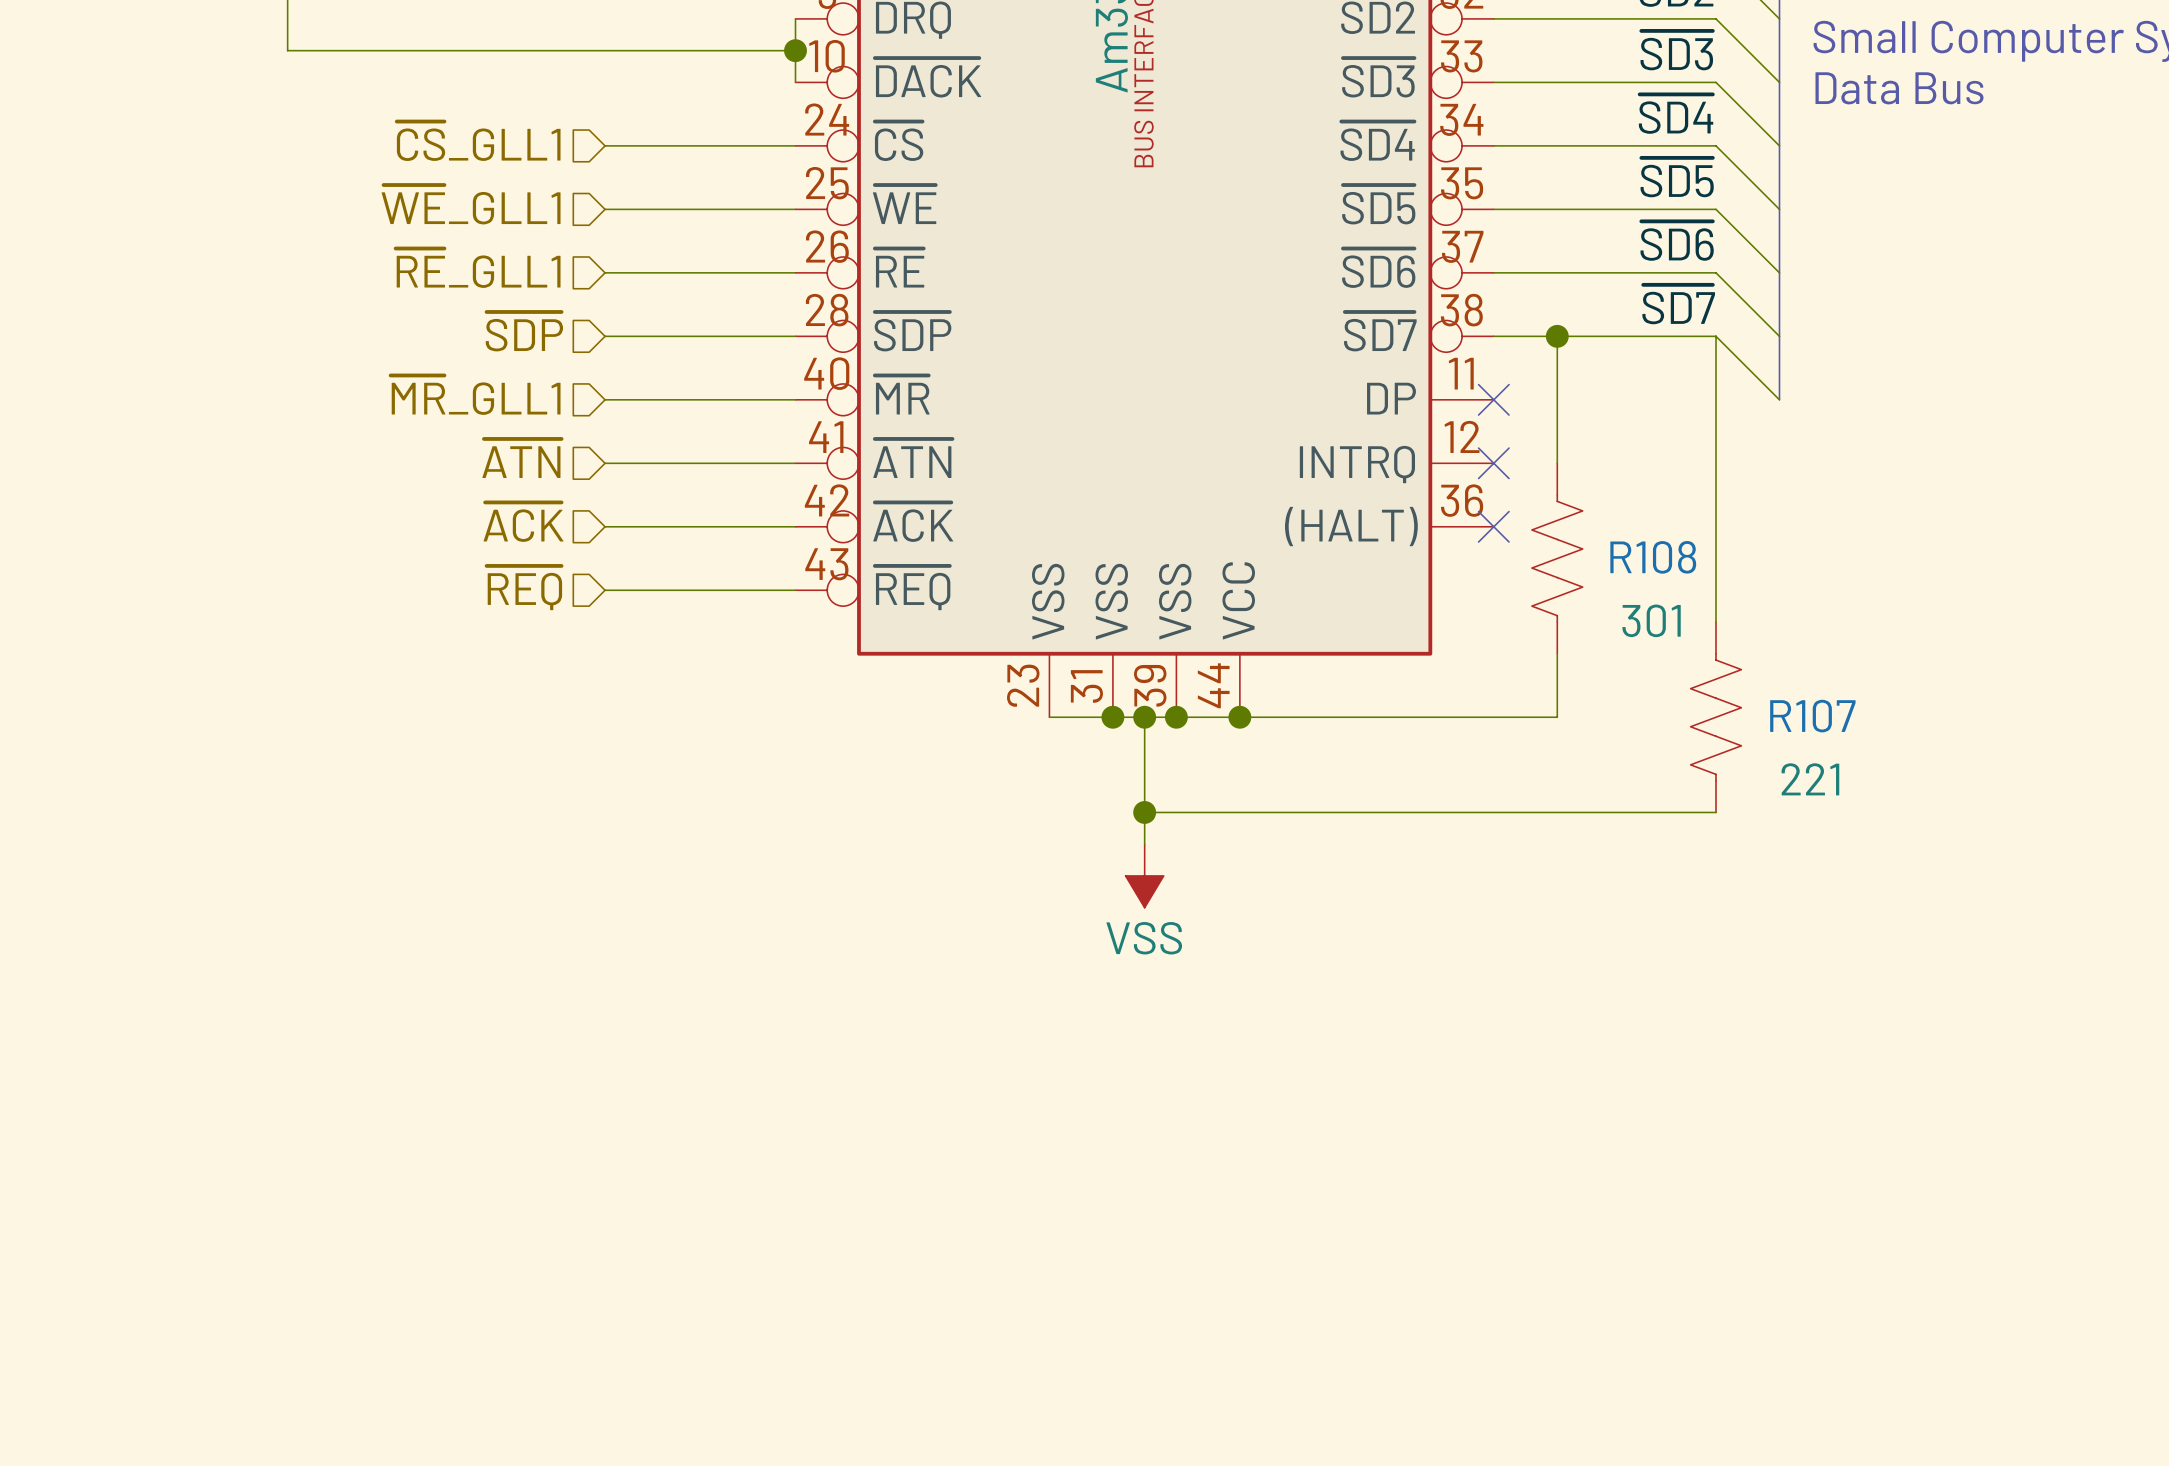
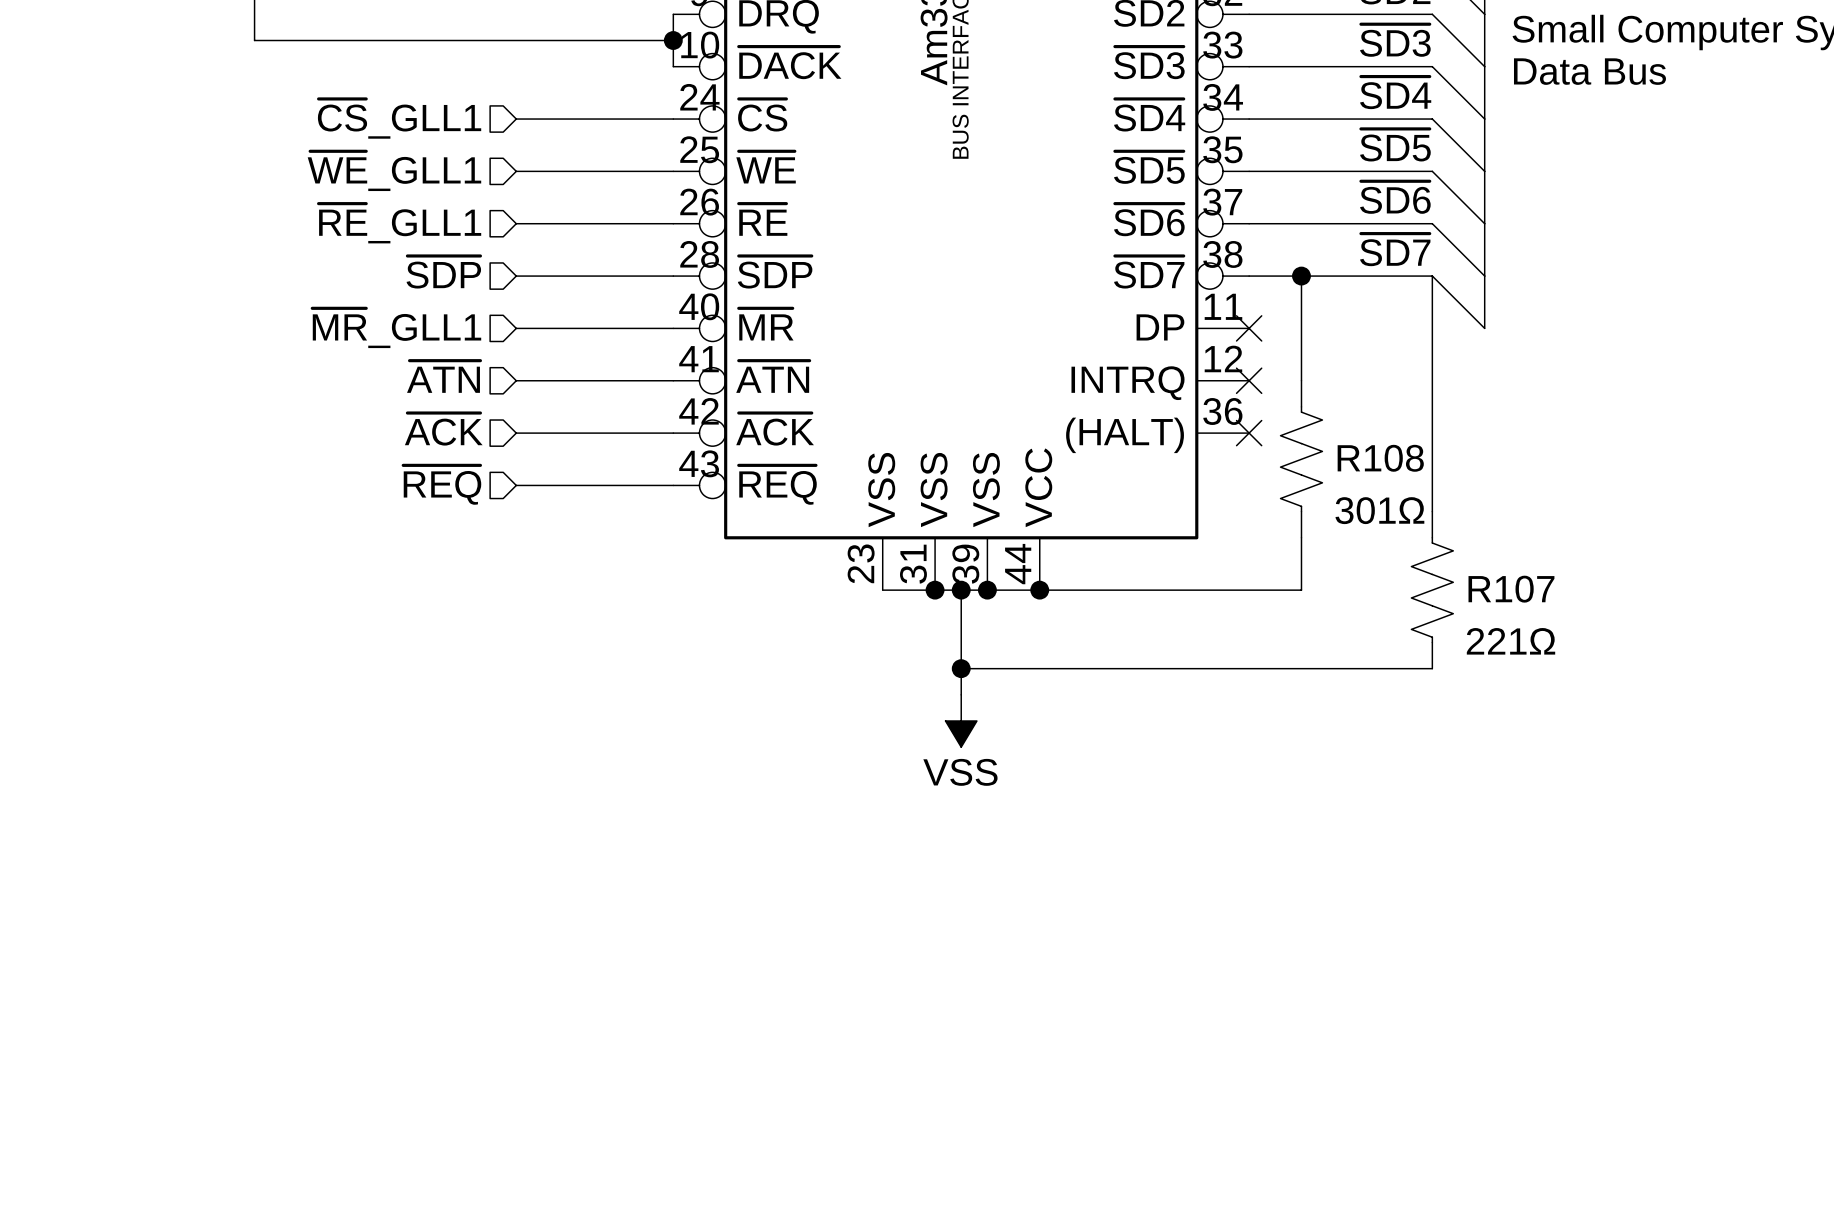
R108 value: 301 (1651, 620) -> 301Ω (1379, 510)
R107 value: 221 (1810, 779) -> 221Ω (1511, 641)

